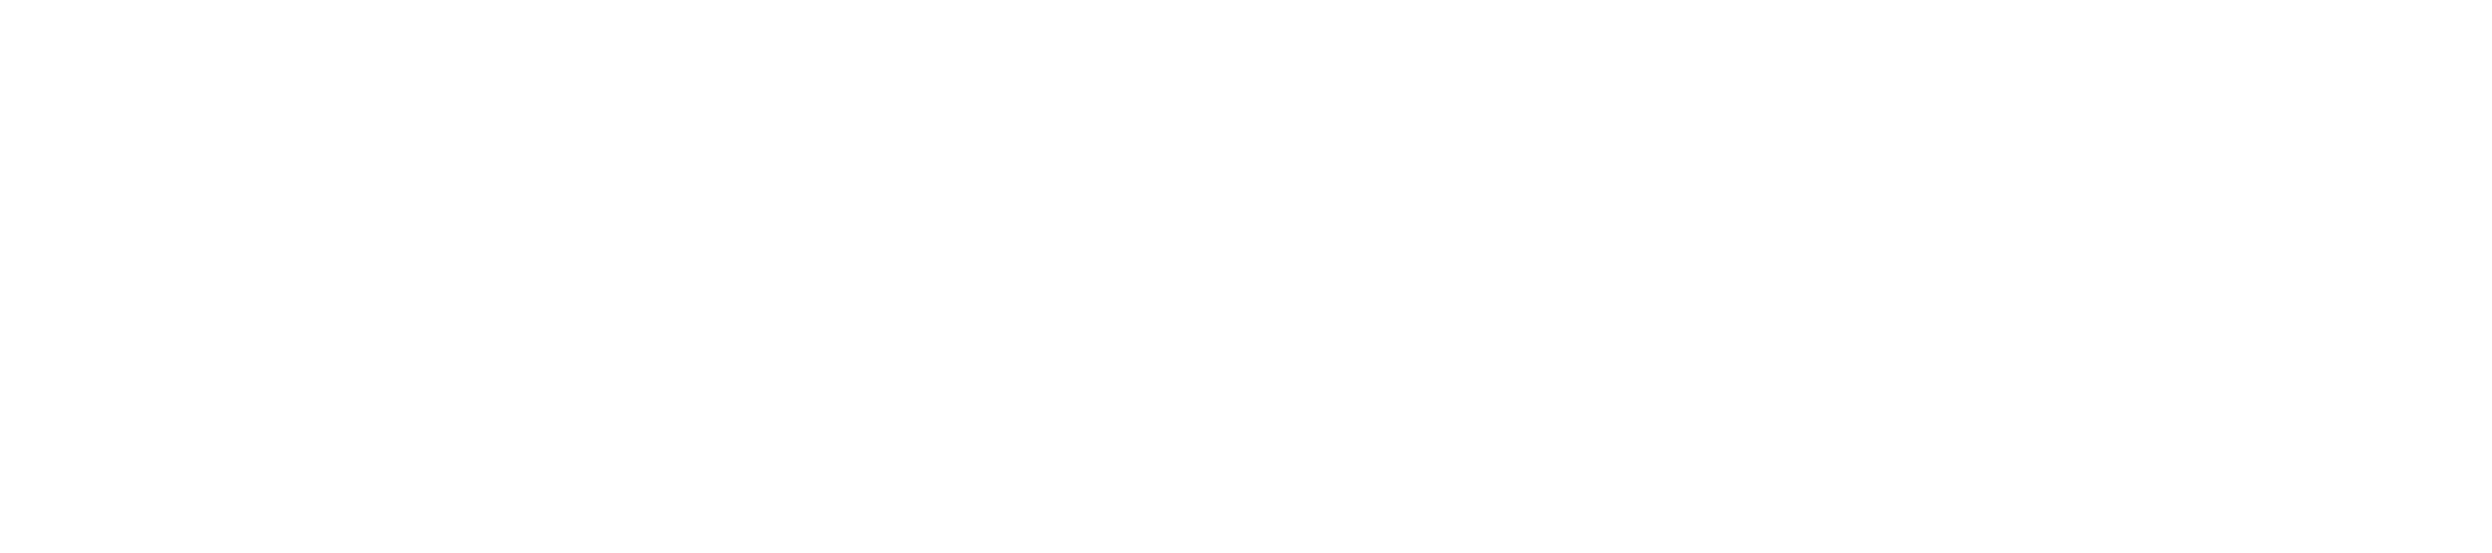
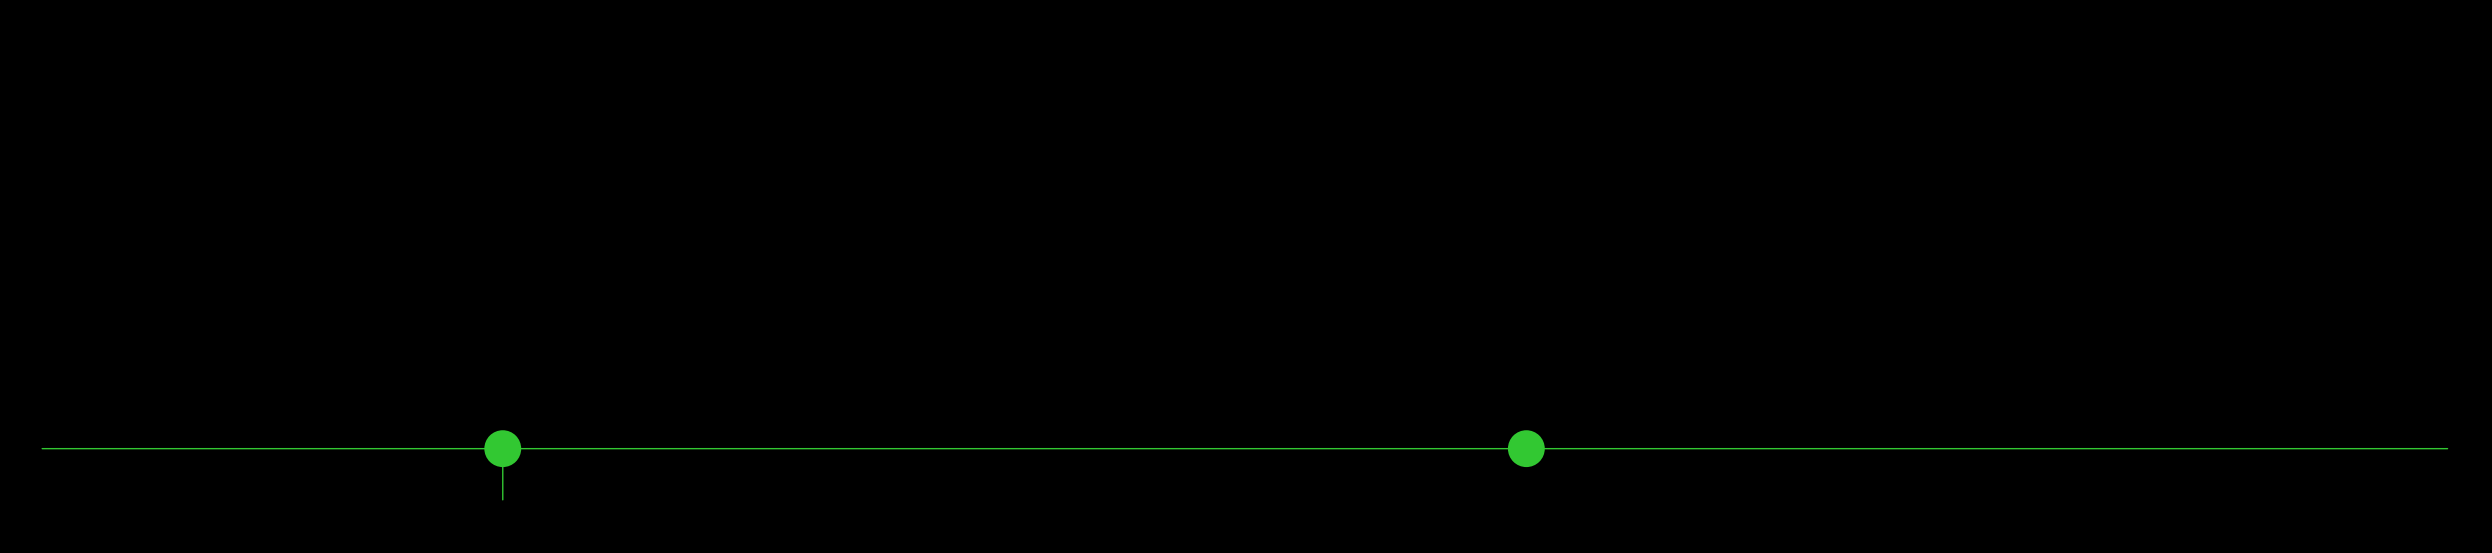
wire: none -> (42, 448) (2447, 448)
wire: none -> (502, 448) (502, 499)
junction: none -> (502, 448)
junction: none -> (1526, 448)

